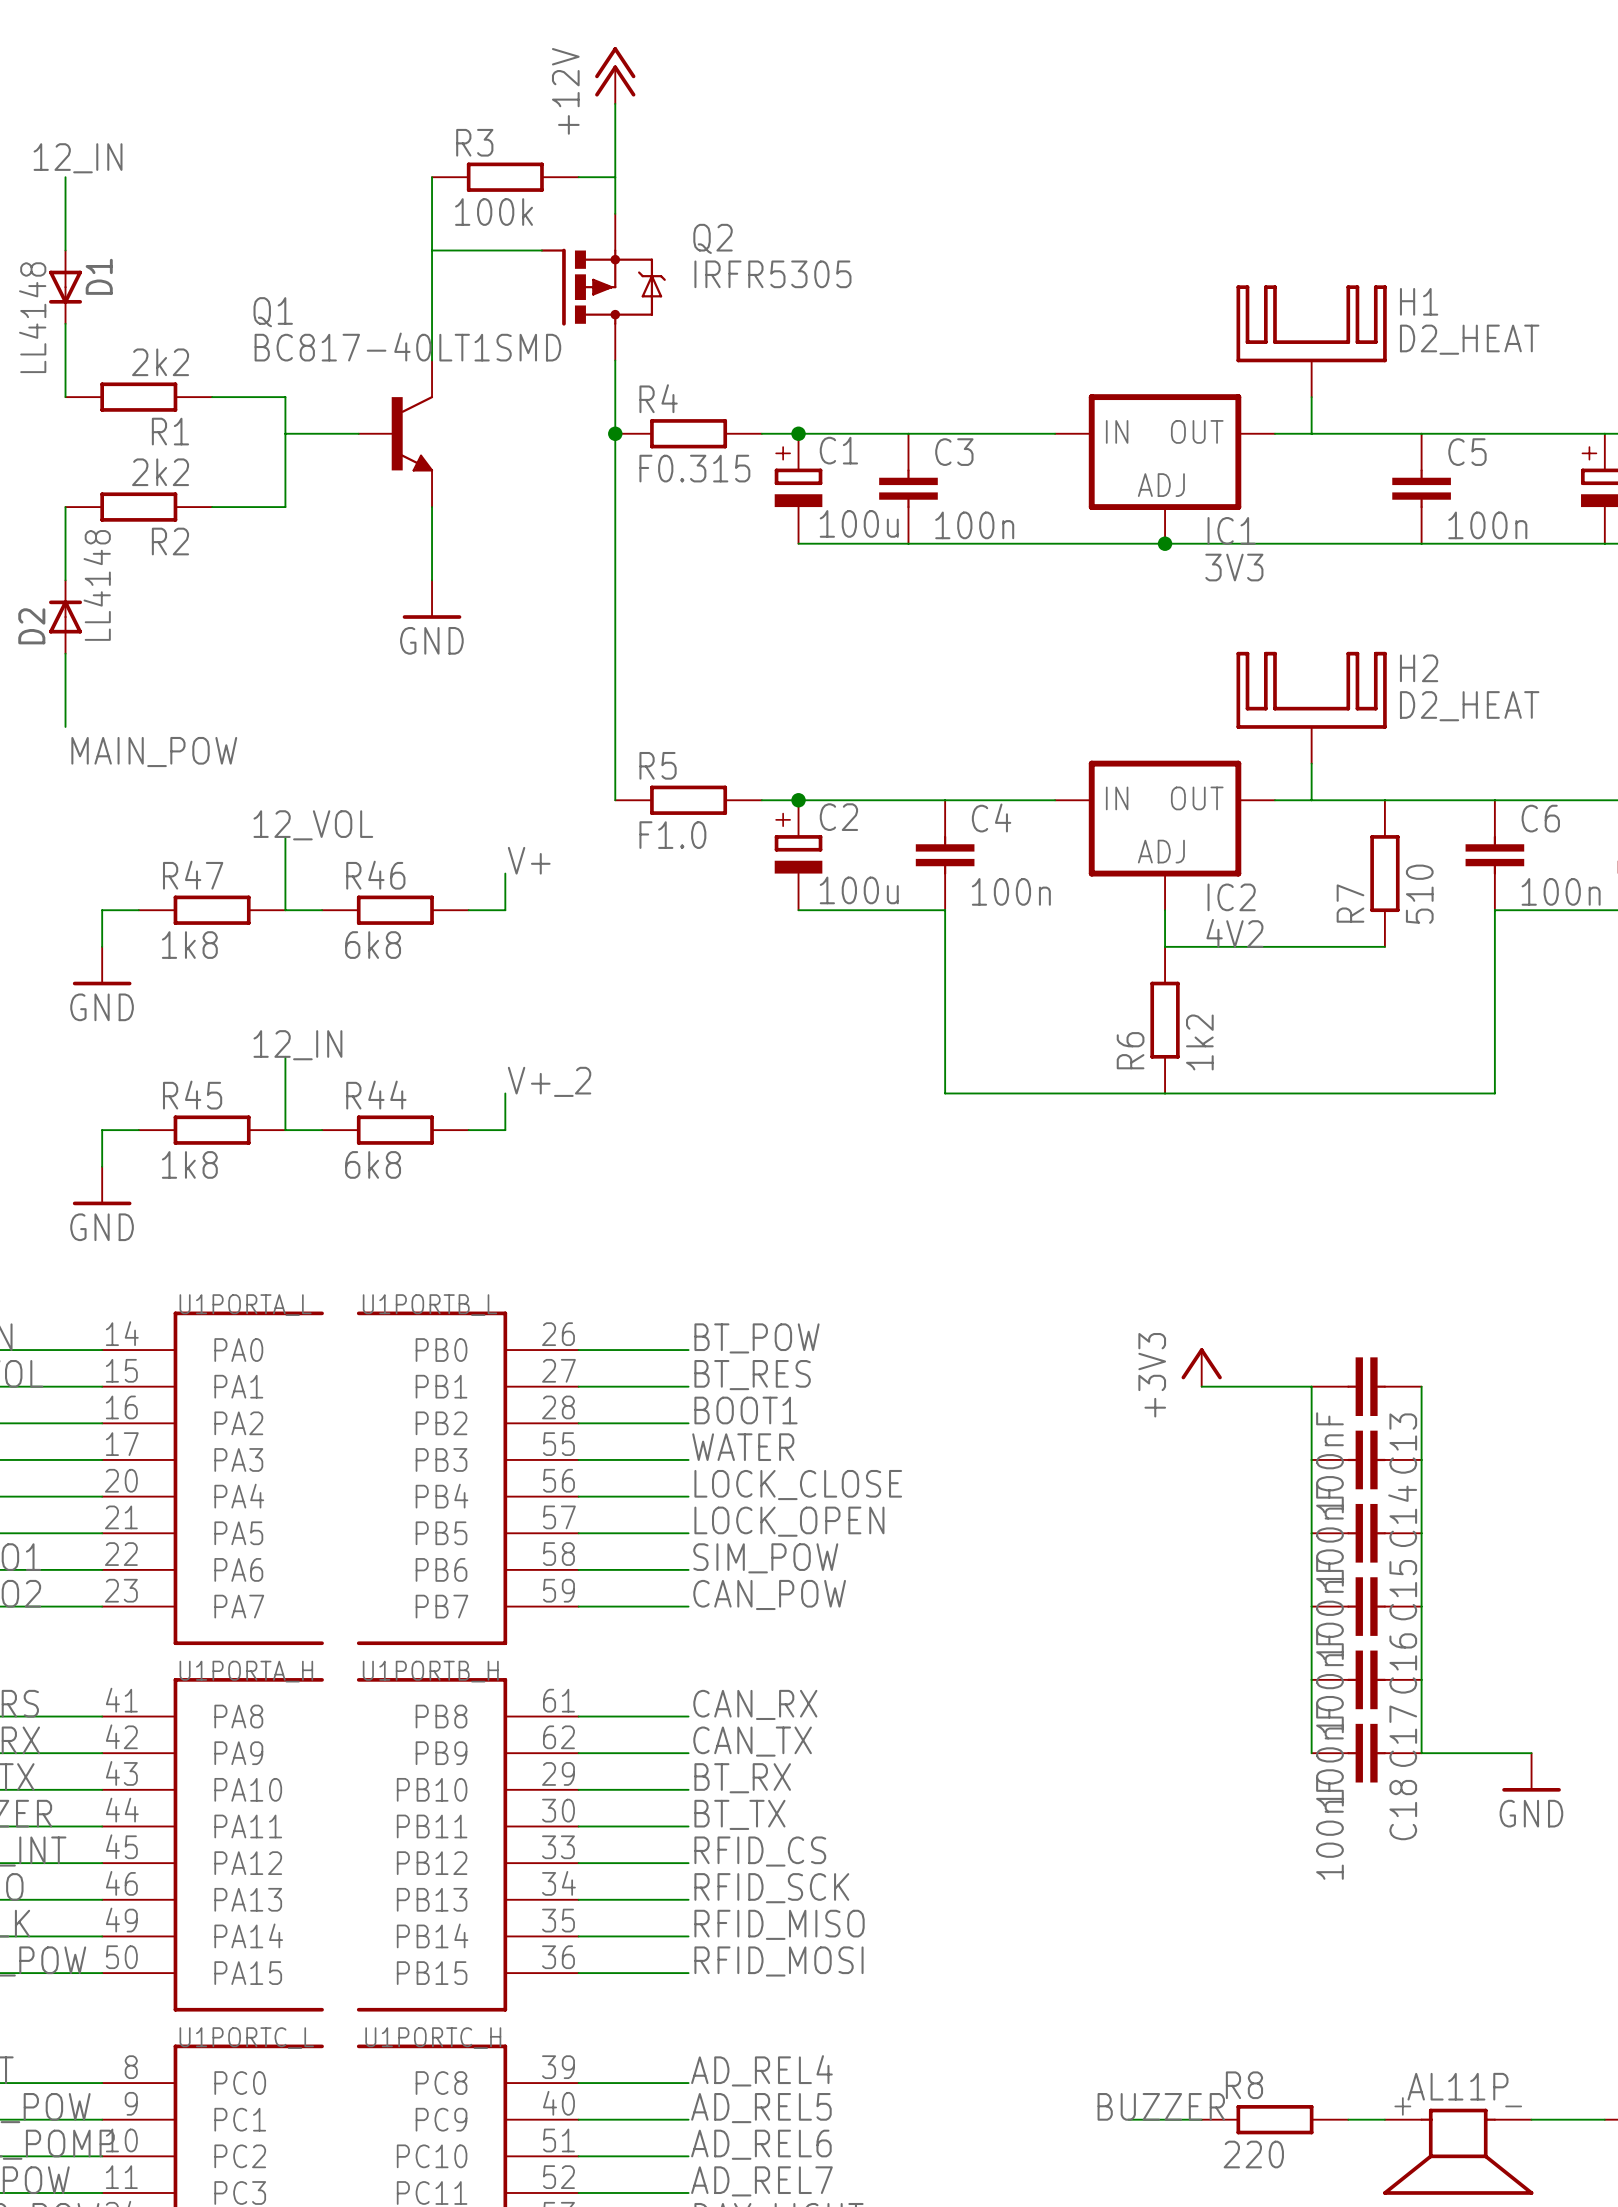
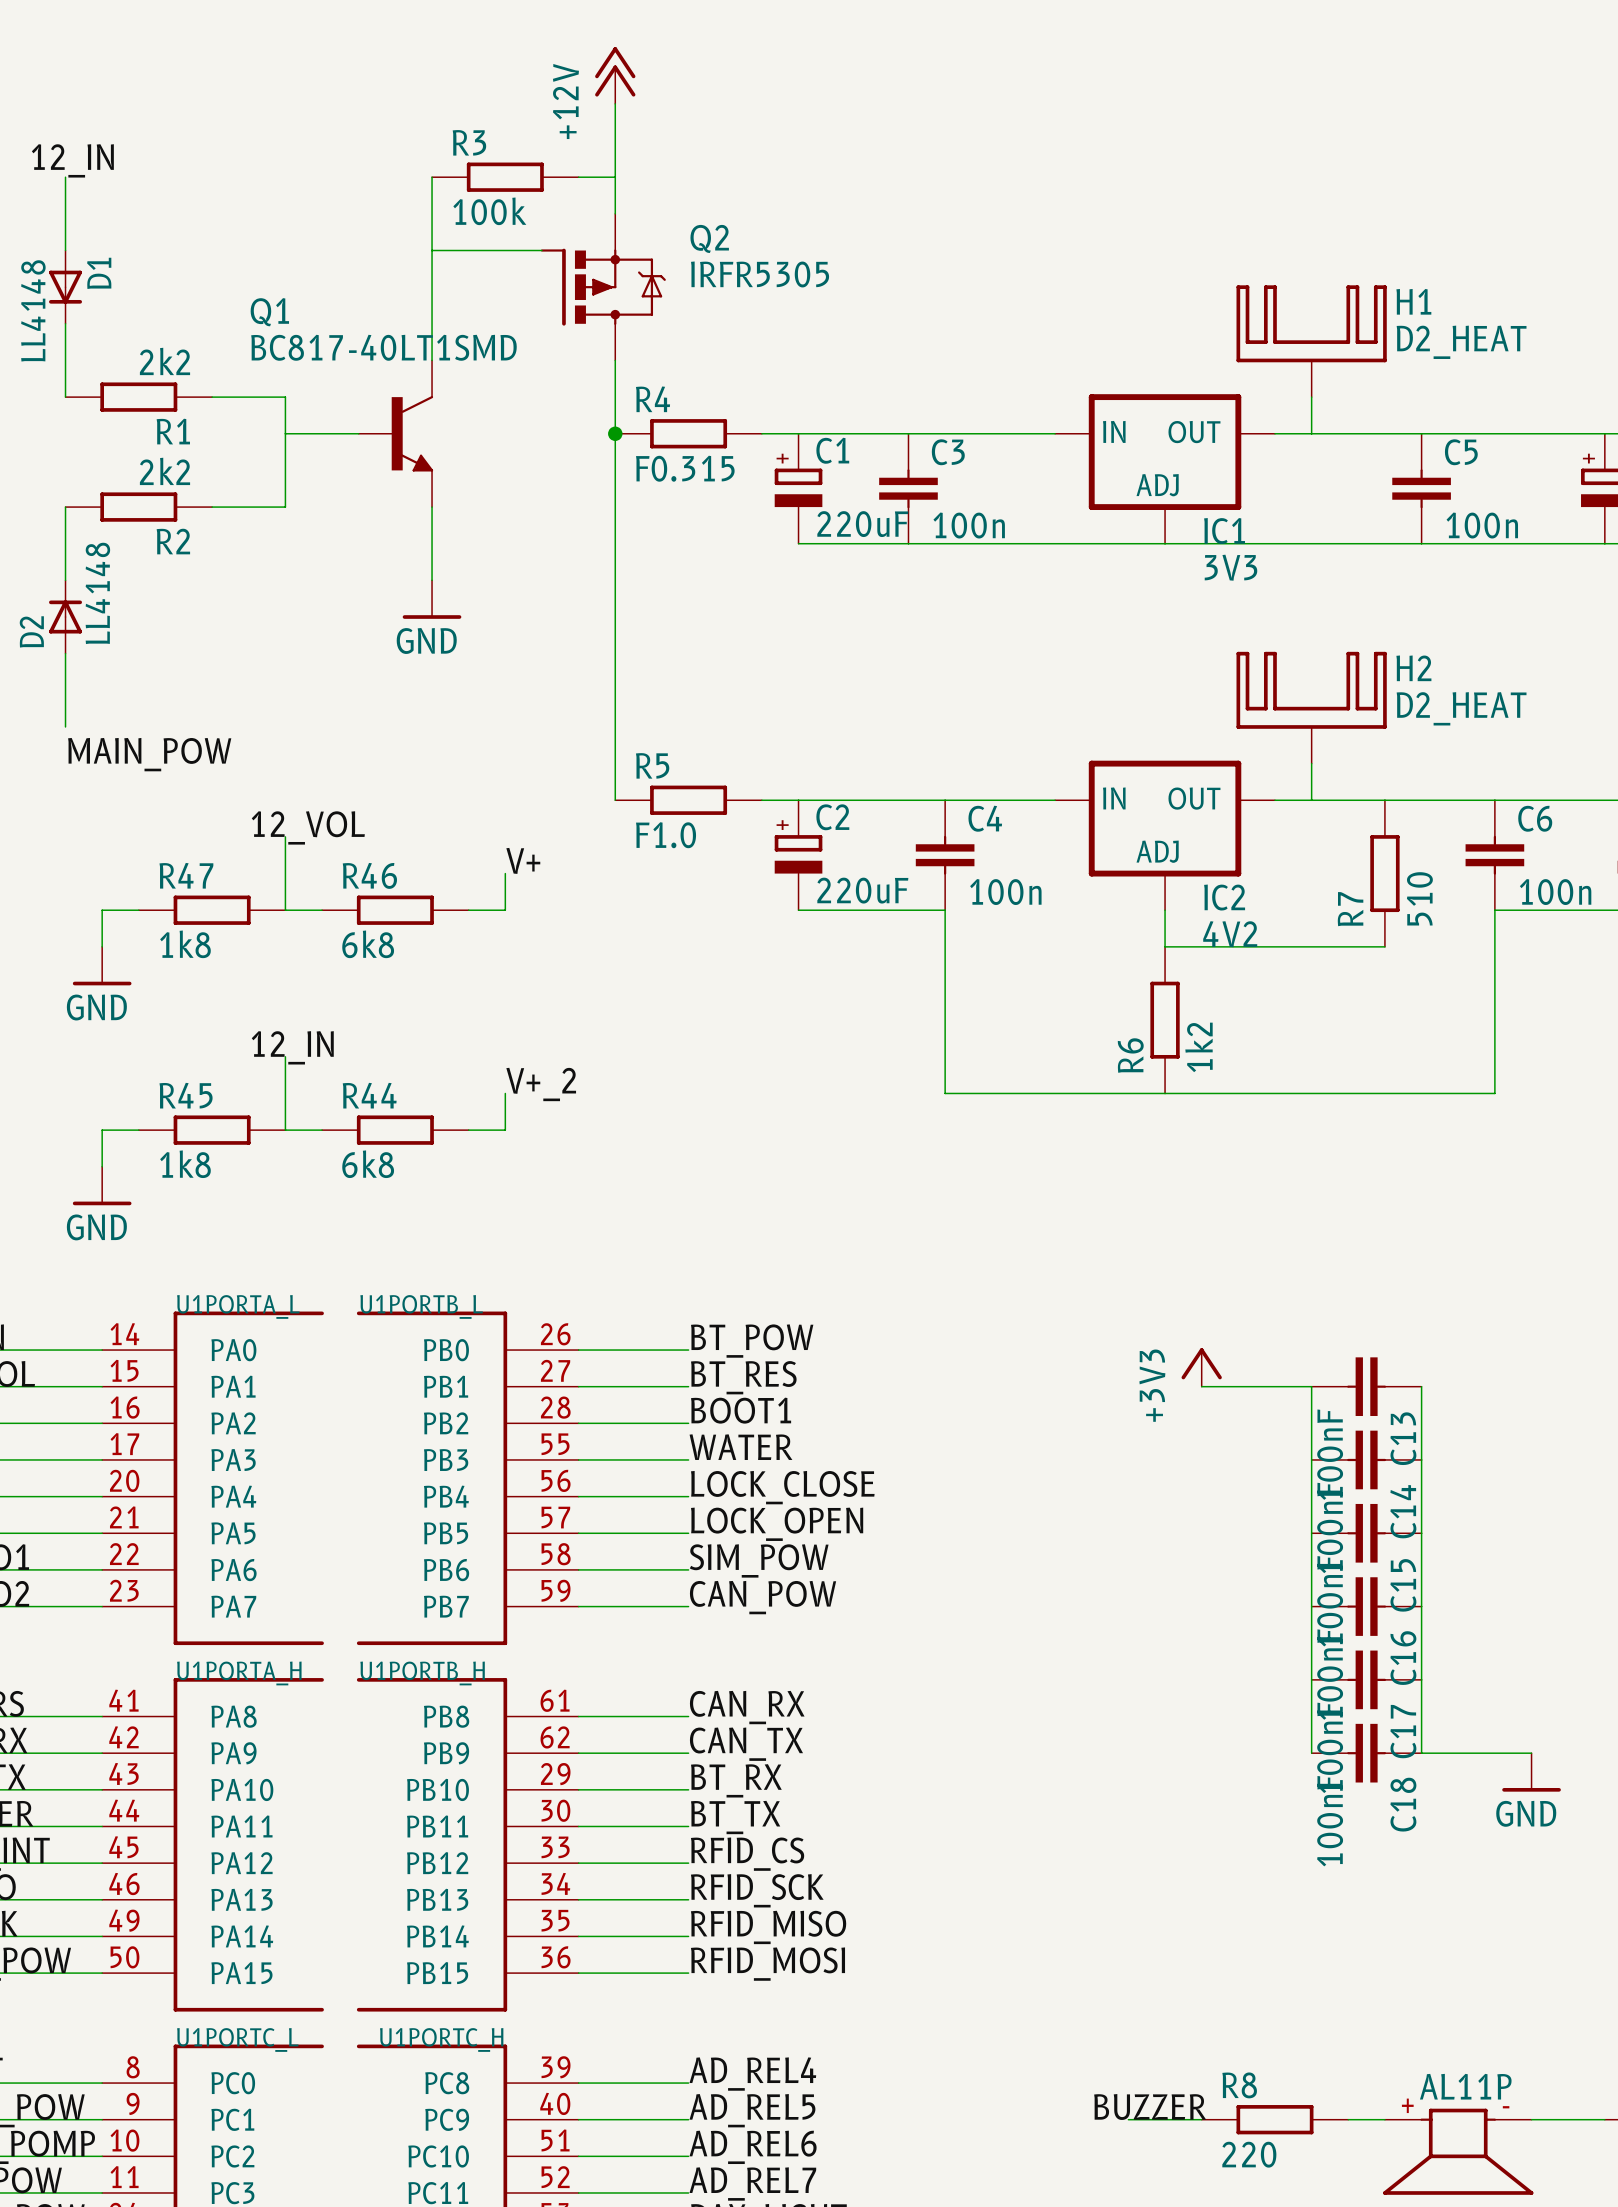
junction: (798, 433) -> none
C1 value: 100u (859, 523) -> 220uF (862, 524)
junction: (1165, 543) -> none
junction: (798, 800) -> none
C2 value: 100u (859, 890) -> 220uF (862, 890)

